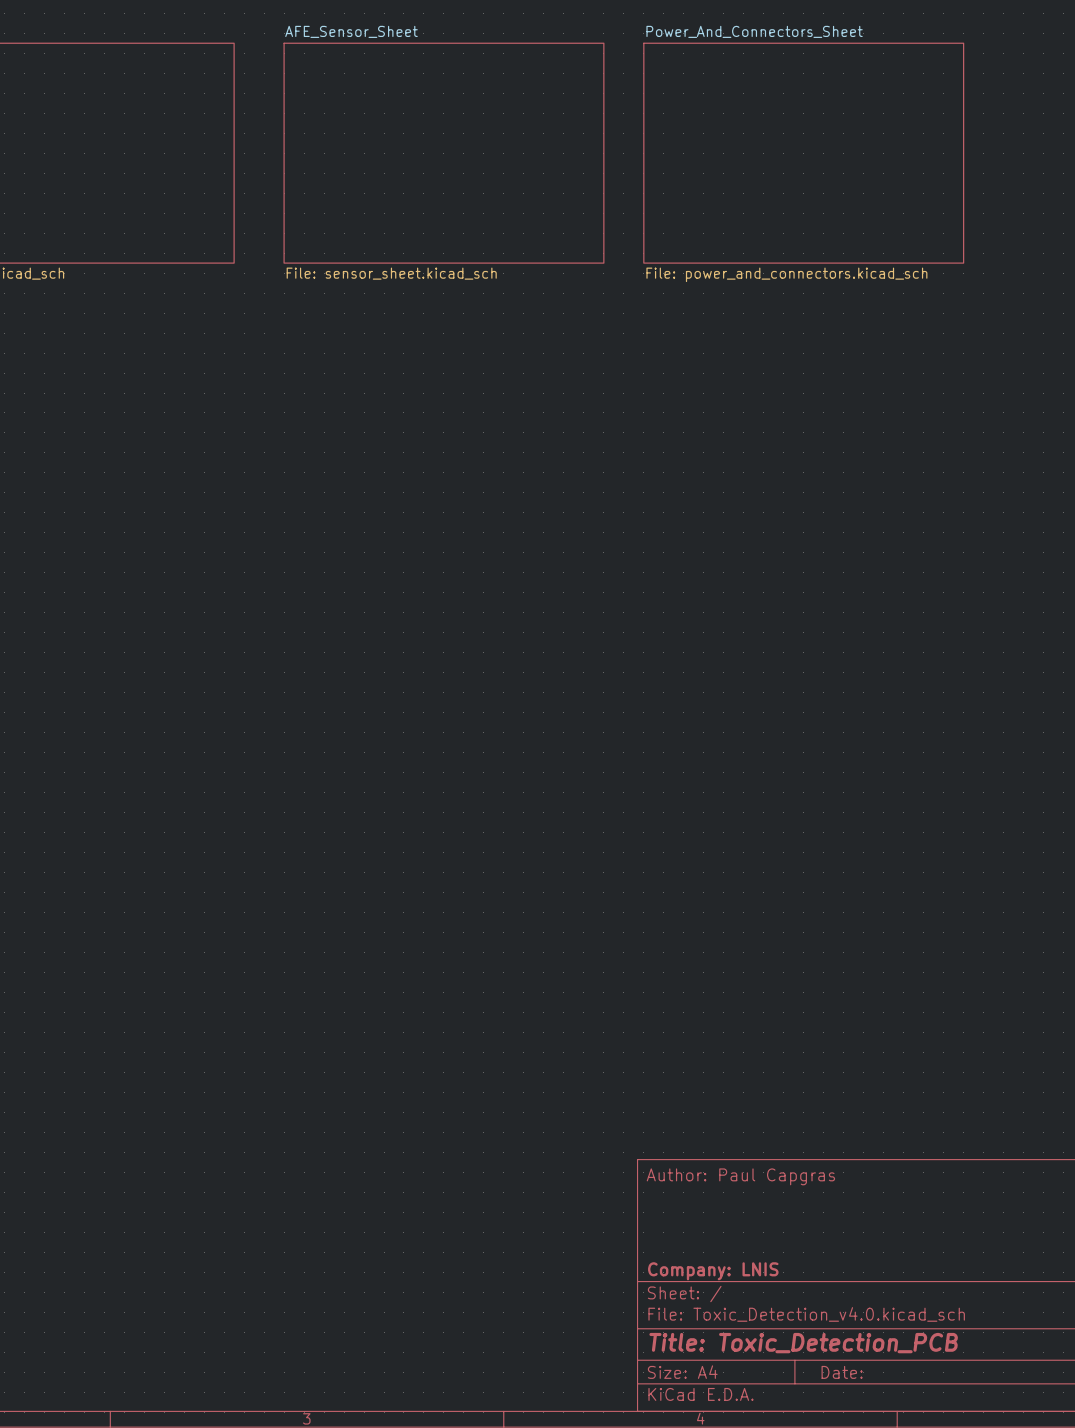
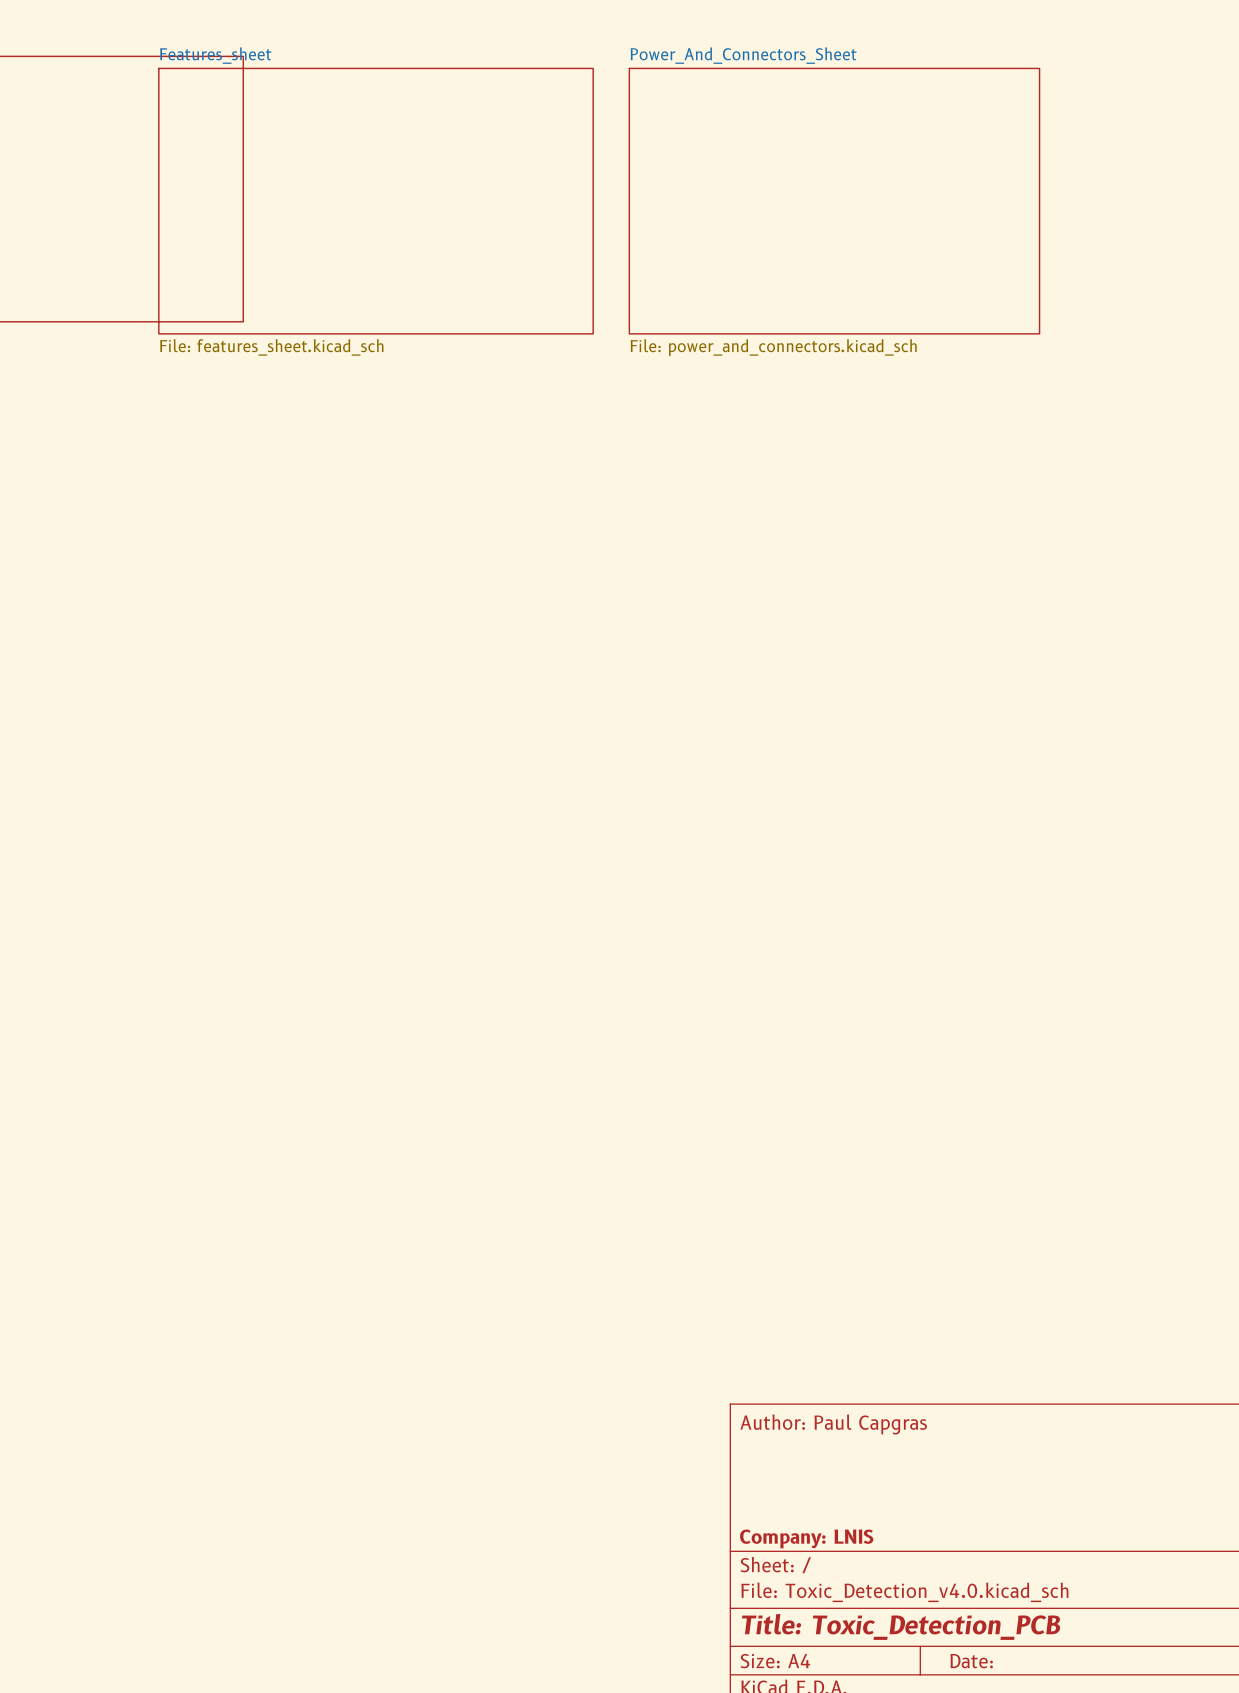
sheet AFE_Sensor_Sheet: File: sensor_sheet.kicad_sch (443, 153) -> none
sheet Power_And_Connectors_Sheet: File: power_and_connectors.kicad_sch (803, 153) -> none
sheet Features_sheet: none -> File: features_sheet.kicad_sch (376, 201)
sheet Power_And_Connectors_Sheet: none -> File: power_and_connectors.kicad_sch (834, 201)

